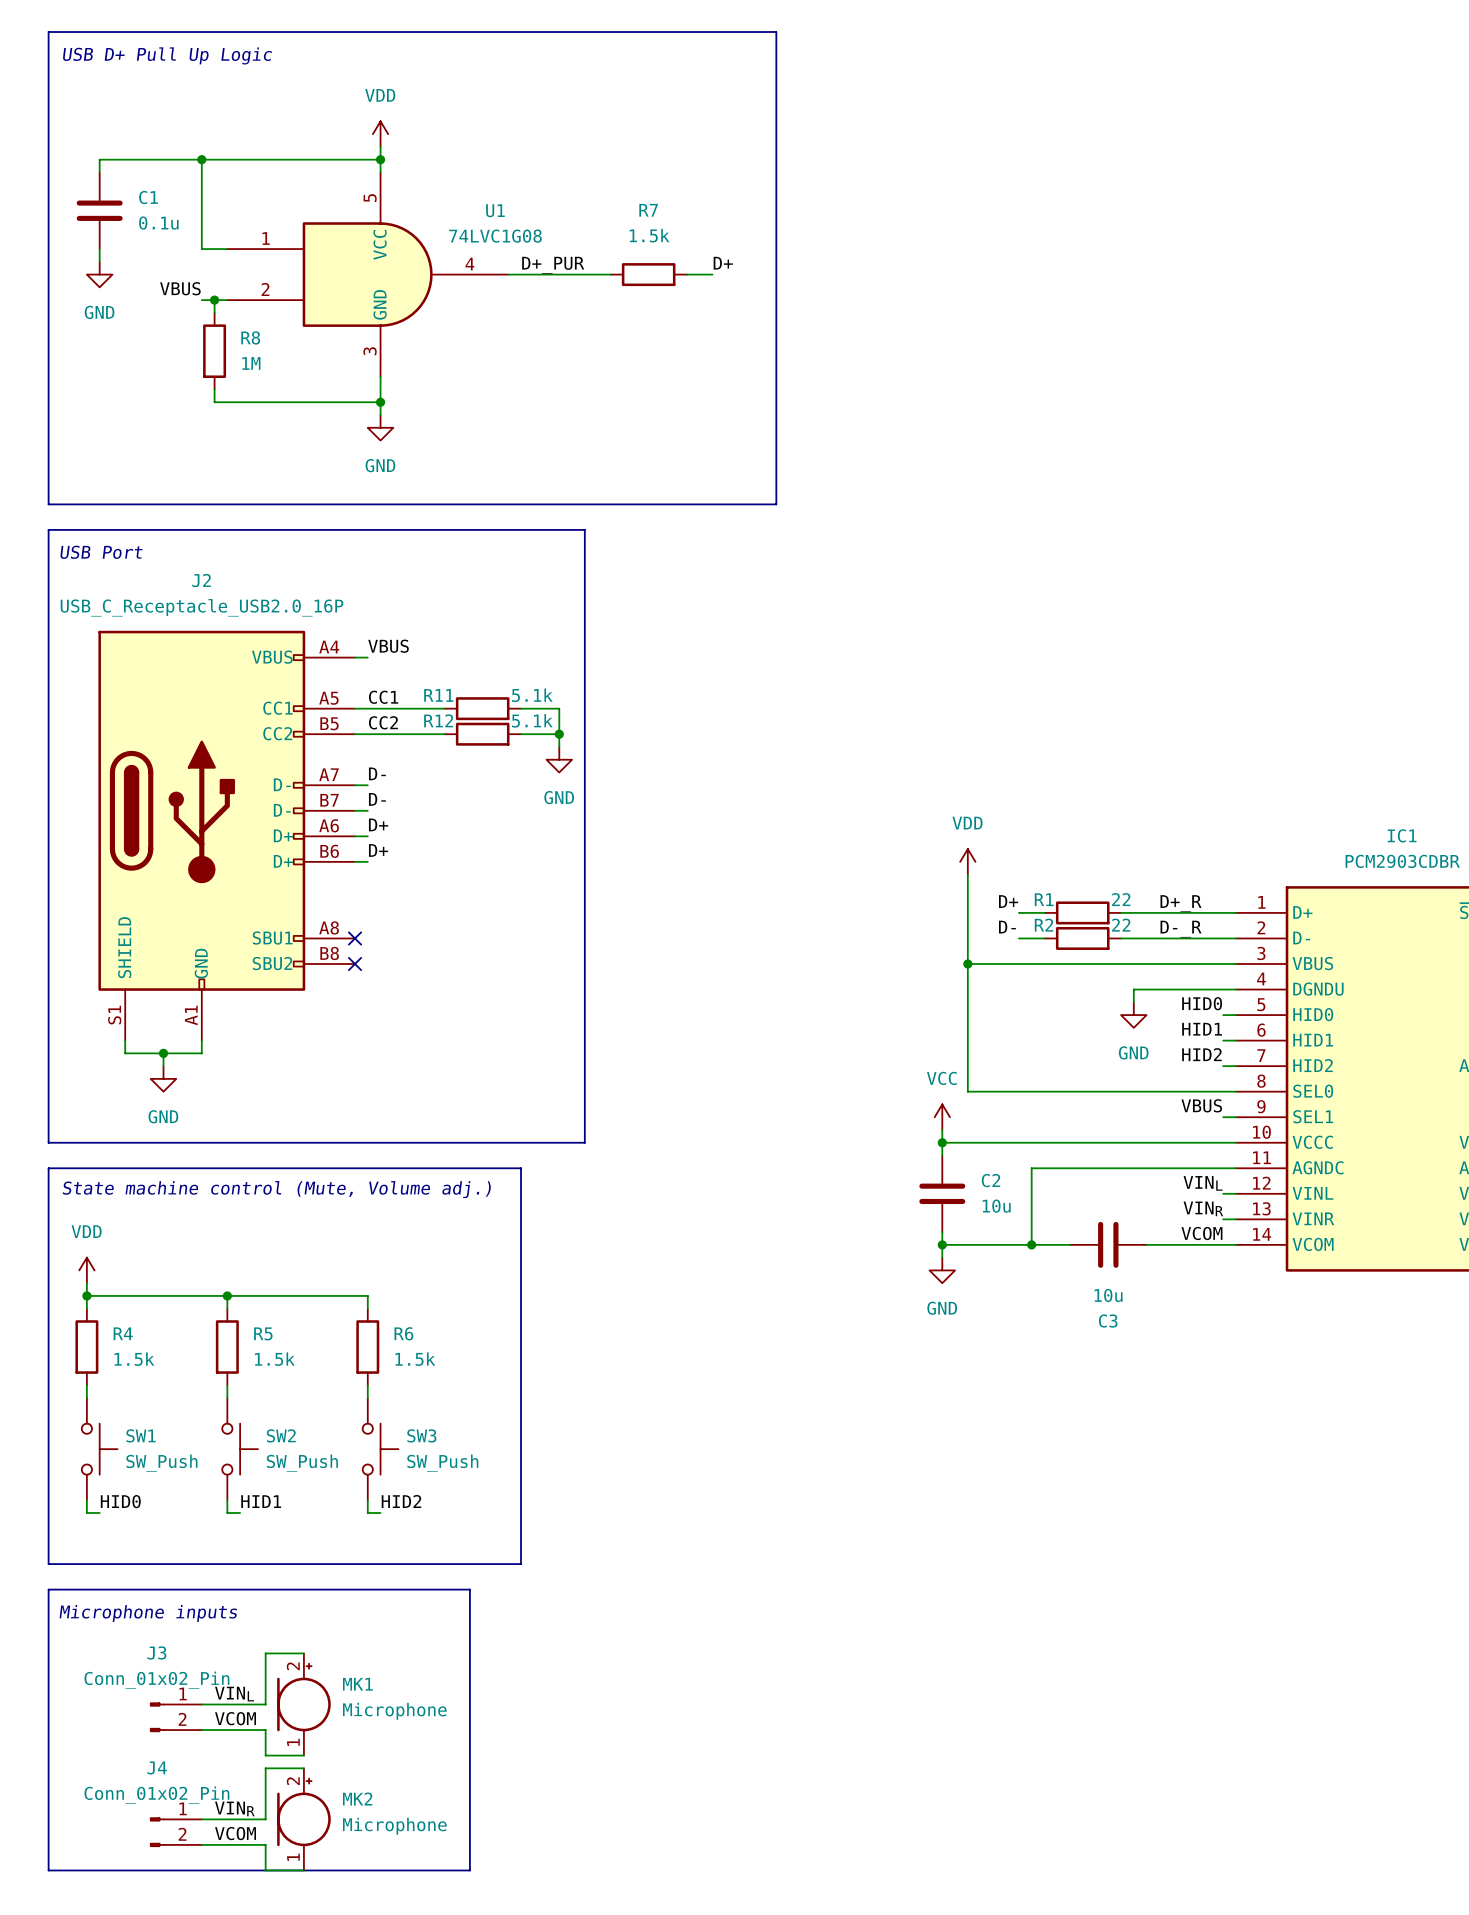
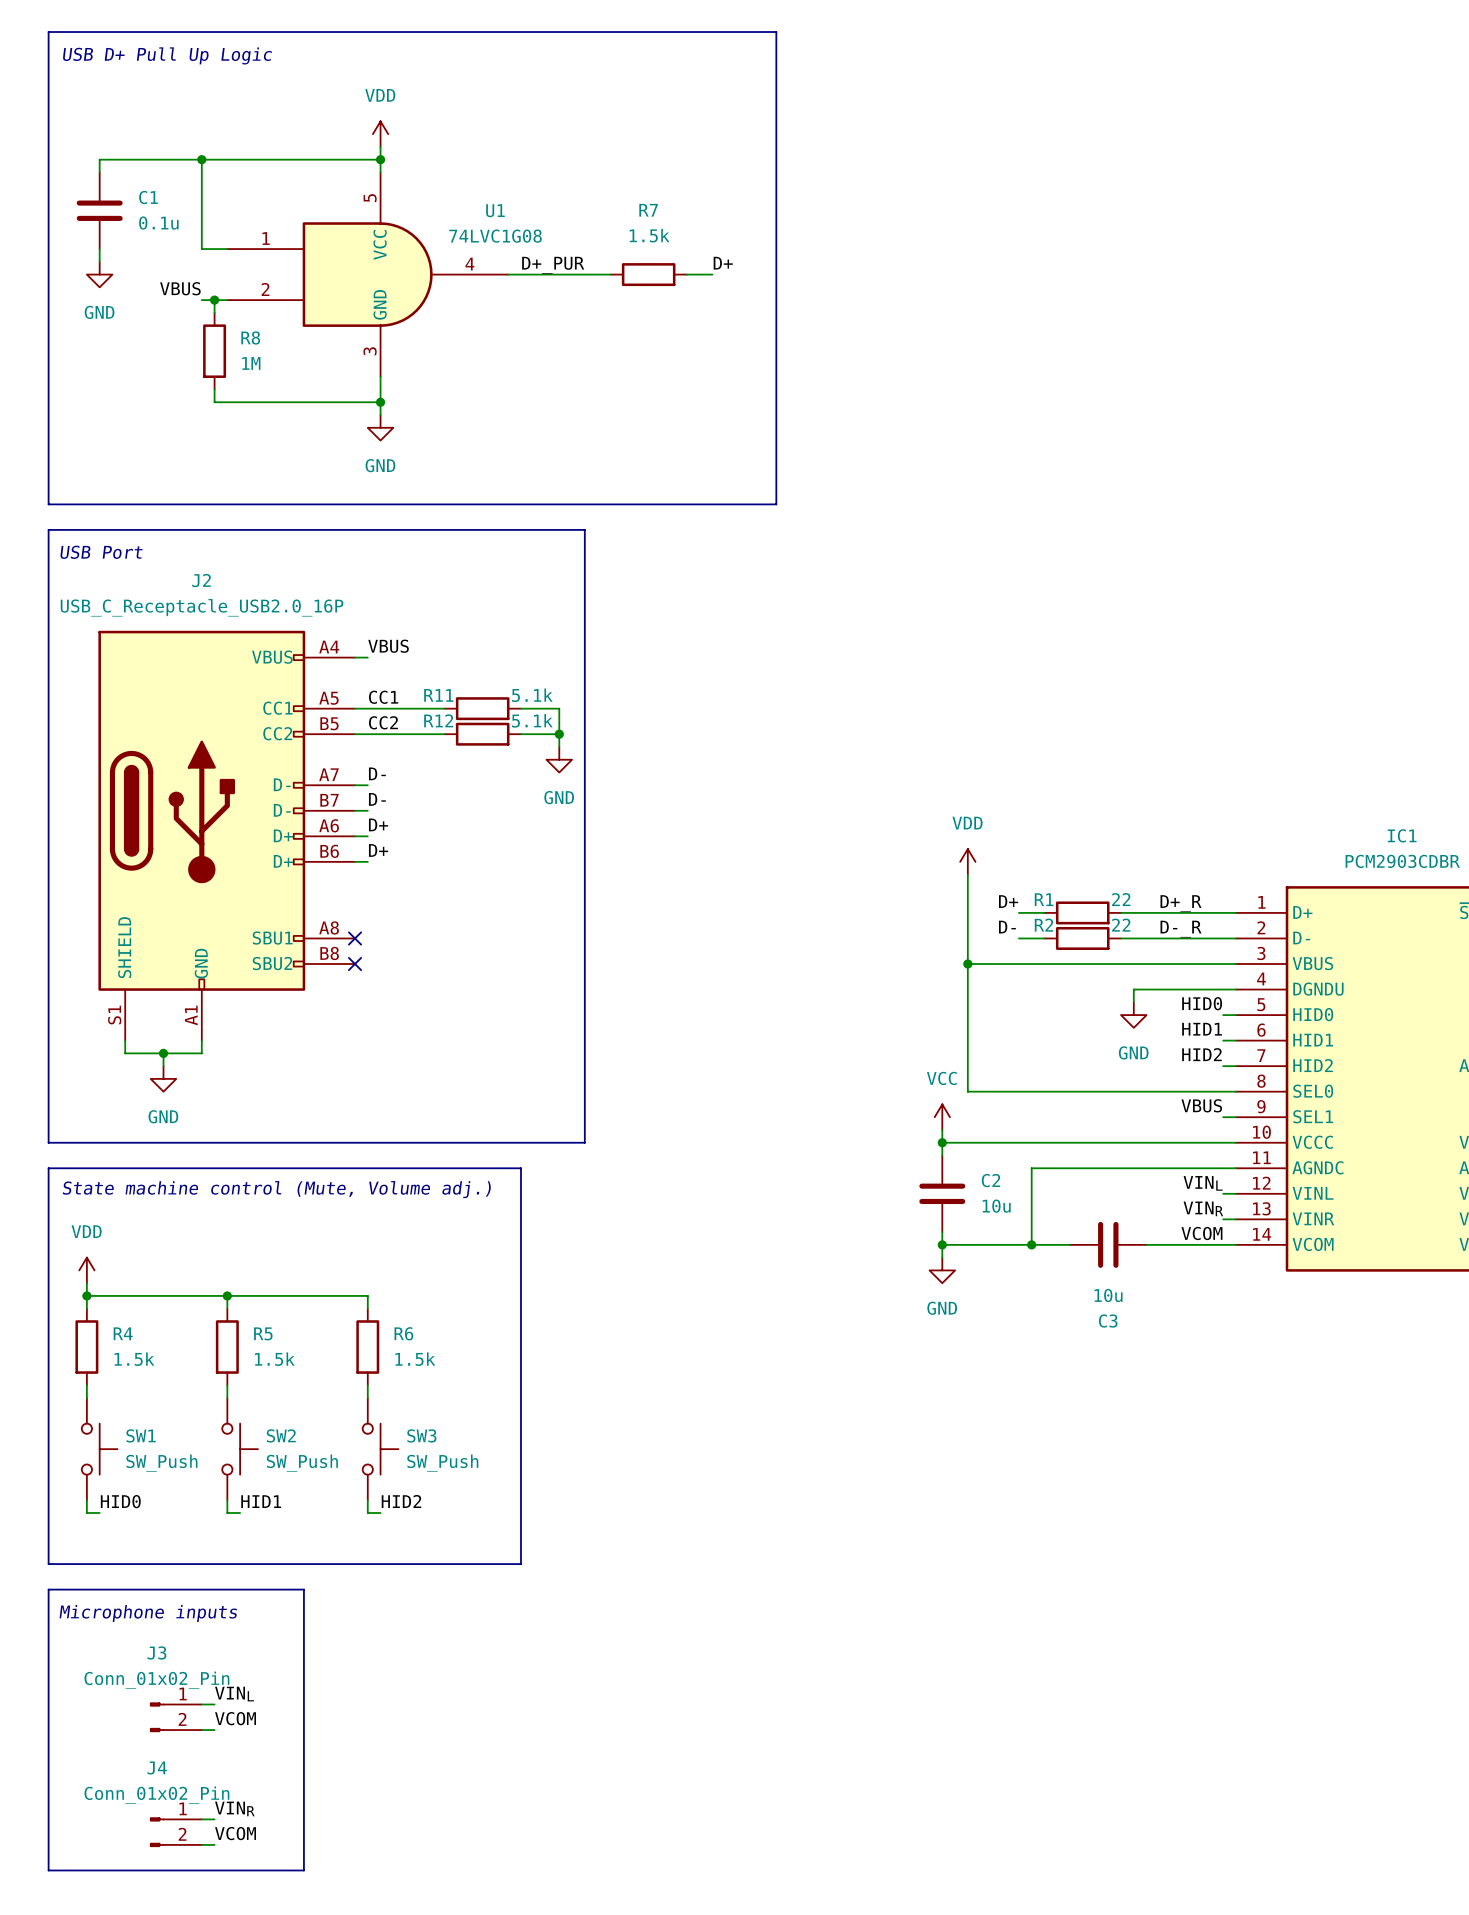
line: (303, 1589) (469, 1589) (469, 1870) (303, 1870) -> (303, 1589) (303, 1870)
wire: (303, 1653) (265, 1653) (265, 1704) (214, 1704) -> none
MK1: Microphone (303, 1704) -> none
wire: (214, 1730) (265, 1730) (265, 1755) (303, 1755) -> none
wire: (303, 1768) (265, 1768) (265, 1819) (214, 1819) -> none
MK2: Microphone (303, 1819) -> none
wire: (214, 1844) (265, 1844) (265, 1870) (303, 1870) -> none

